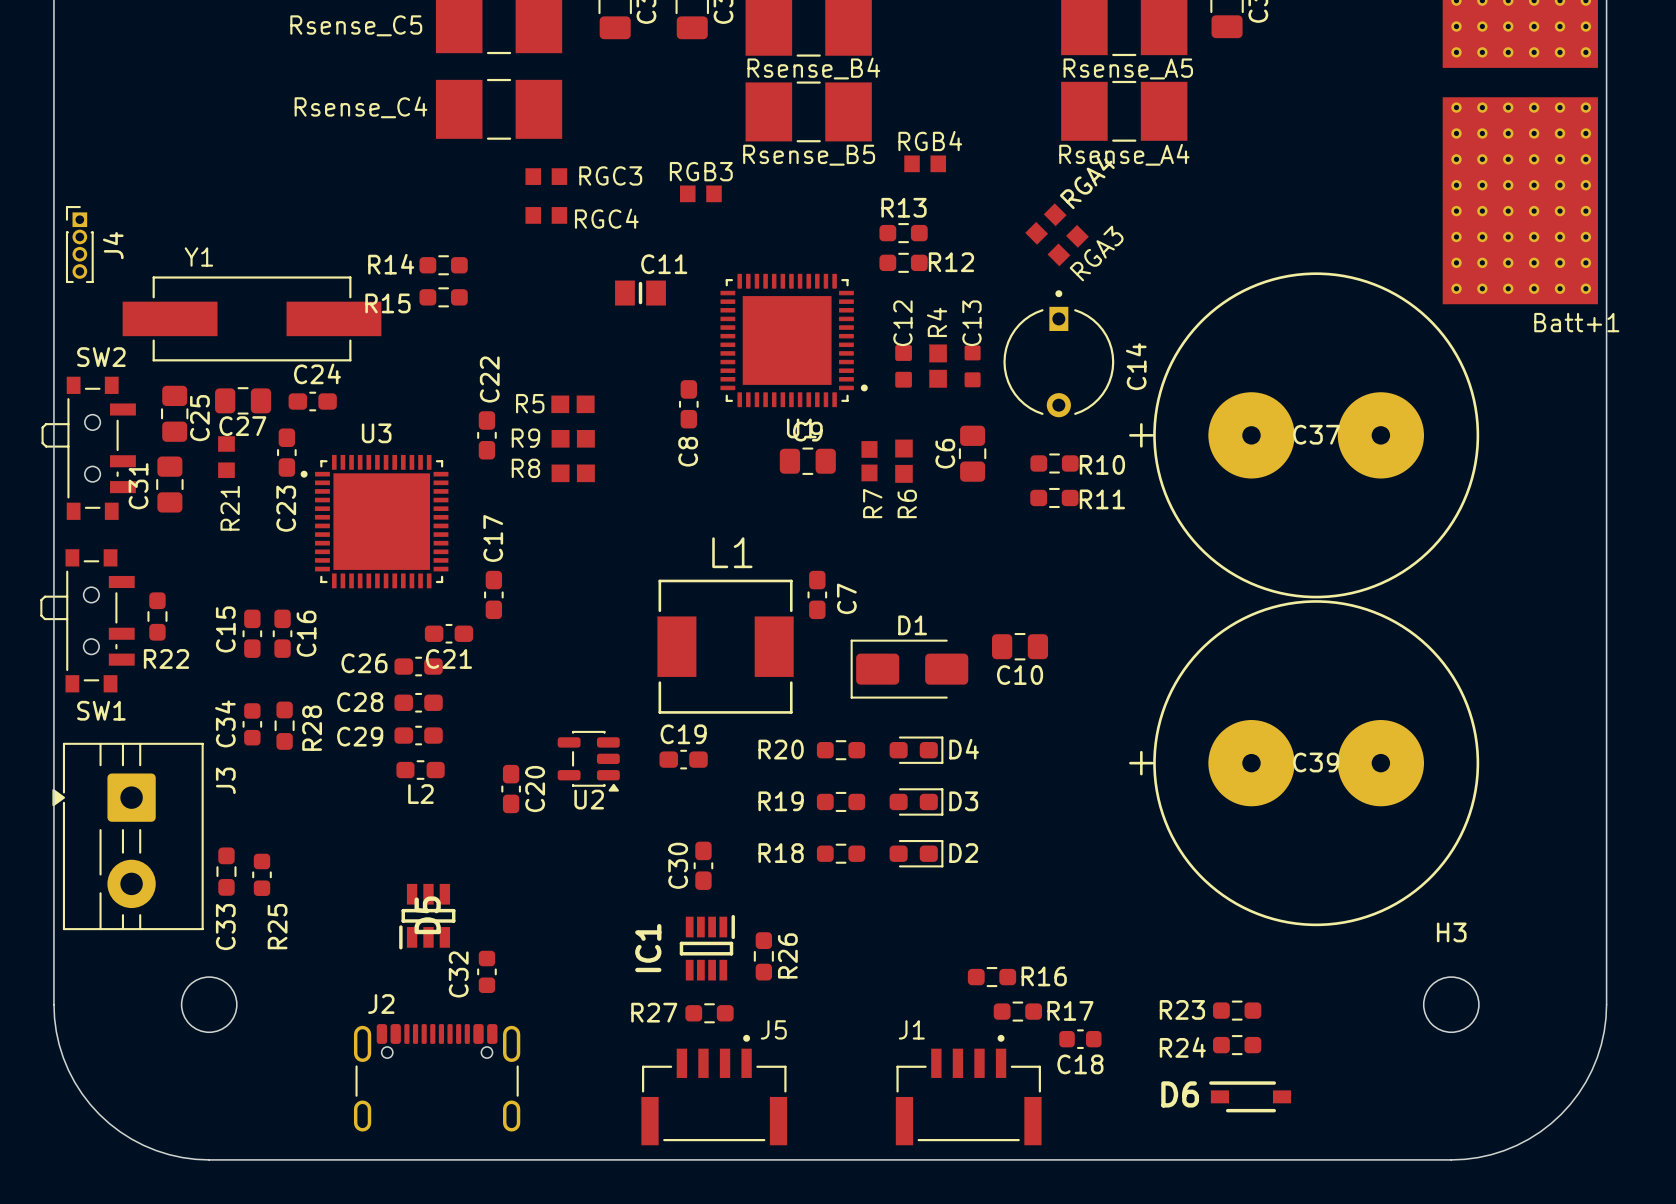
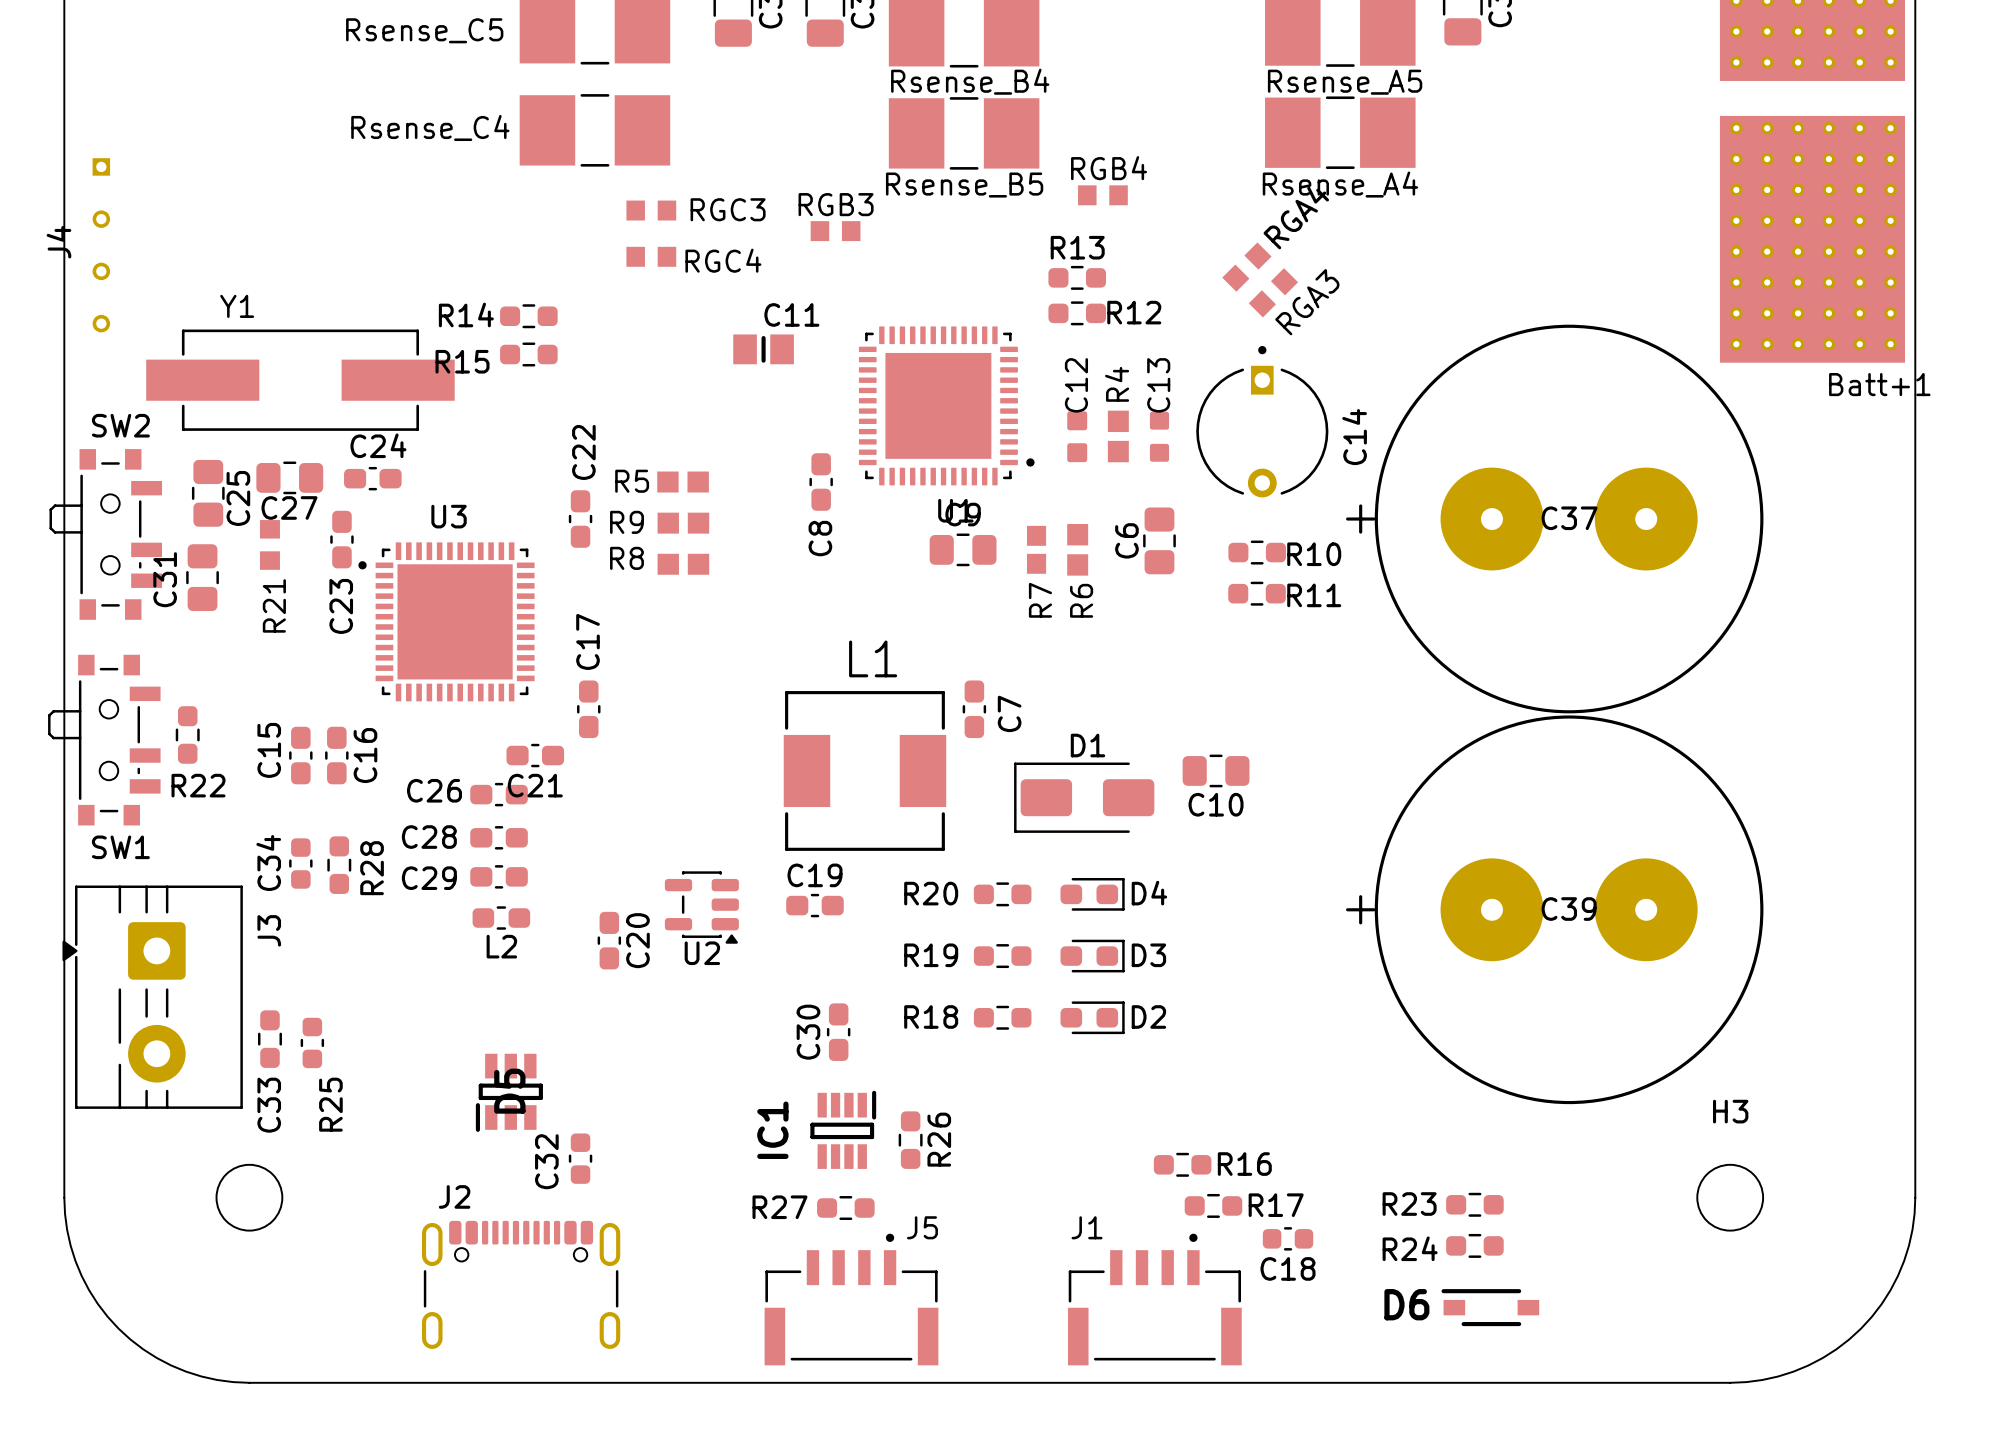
J4 footprint: [65, 206, 94, 284] -> [92, 158, 111, 333]
J4 name position: J4 (113, 245) -> J4 (58, 242)

